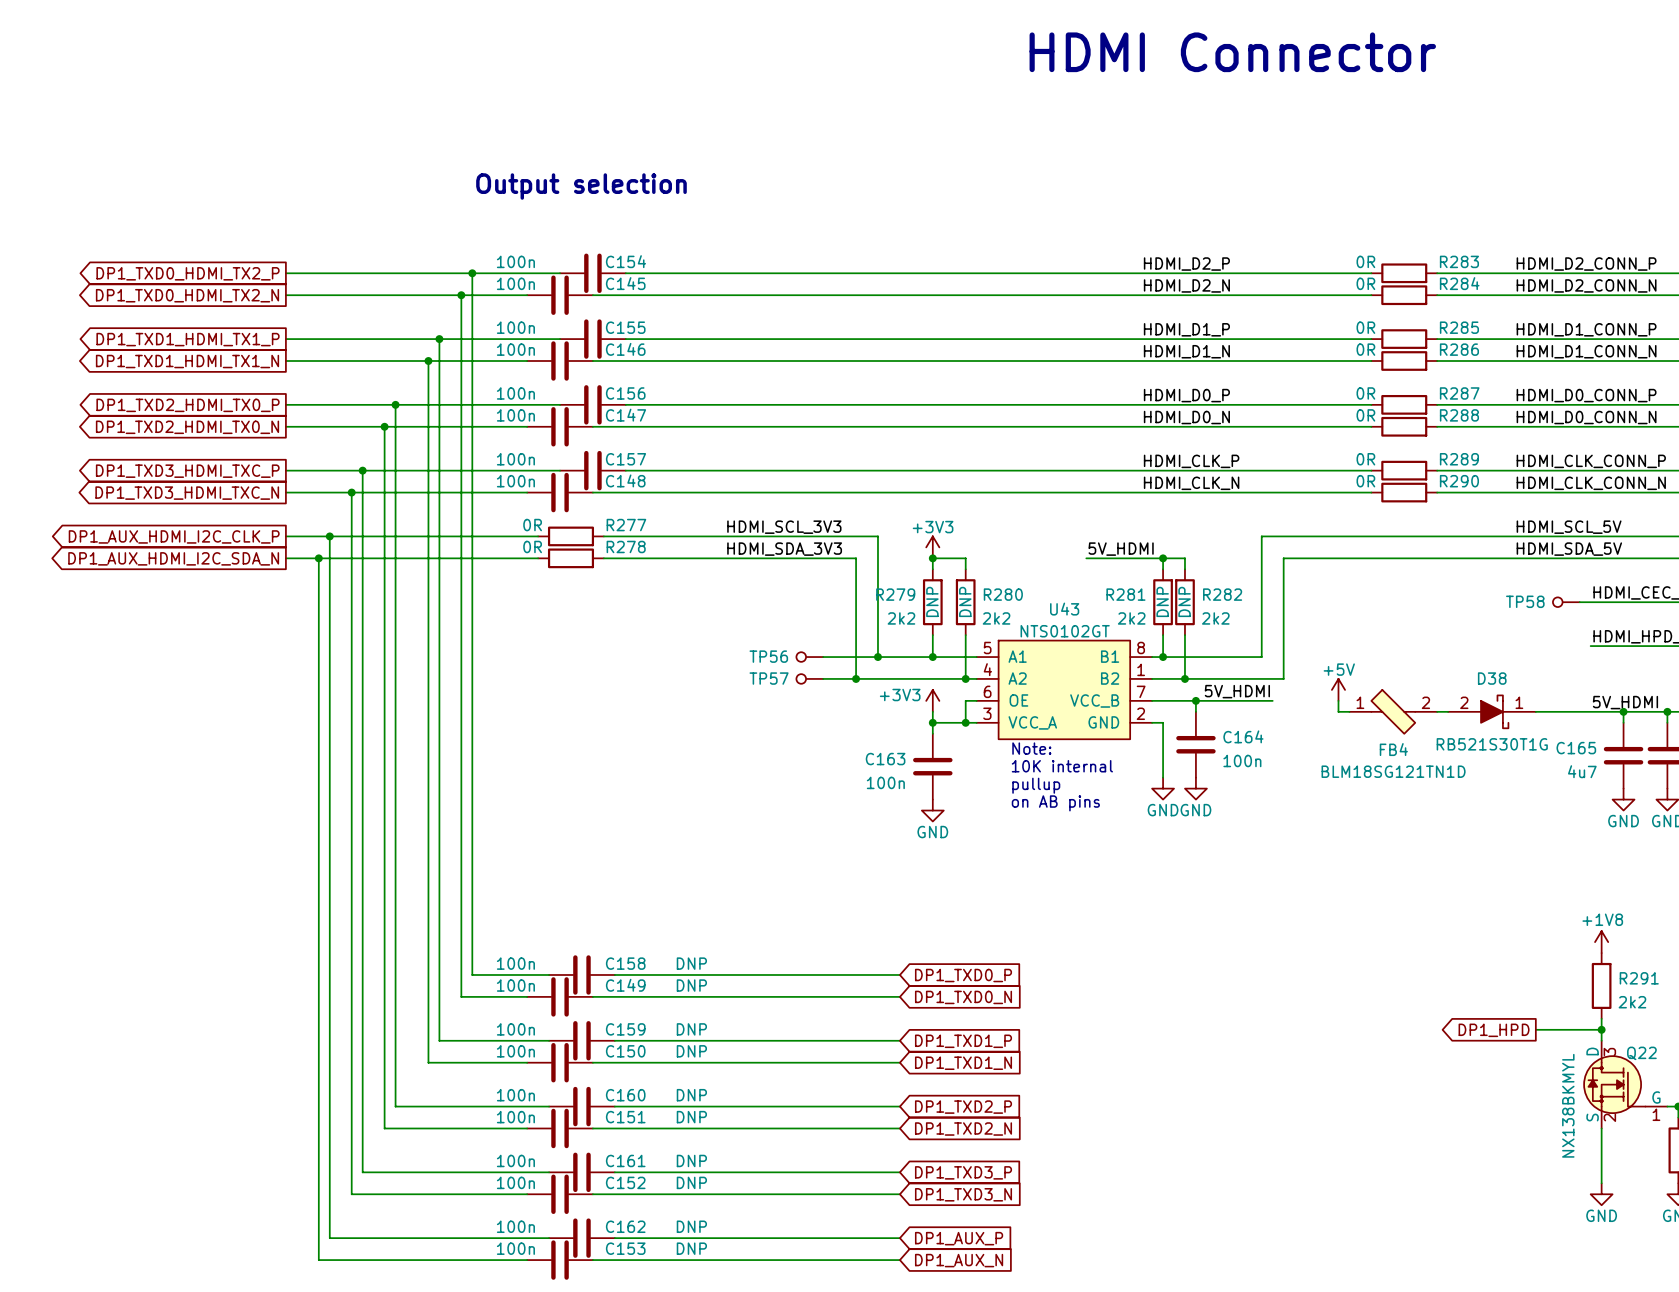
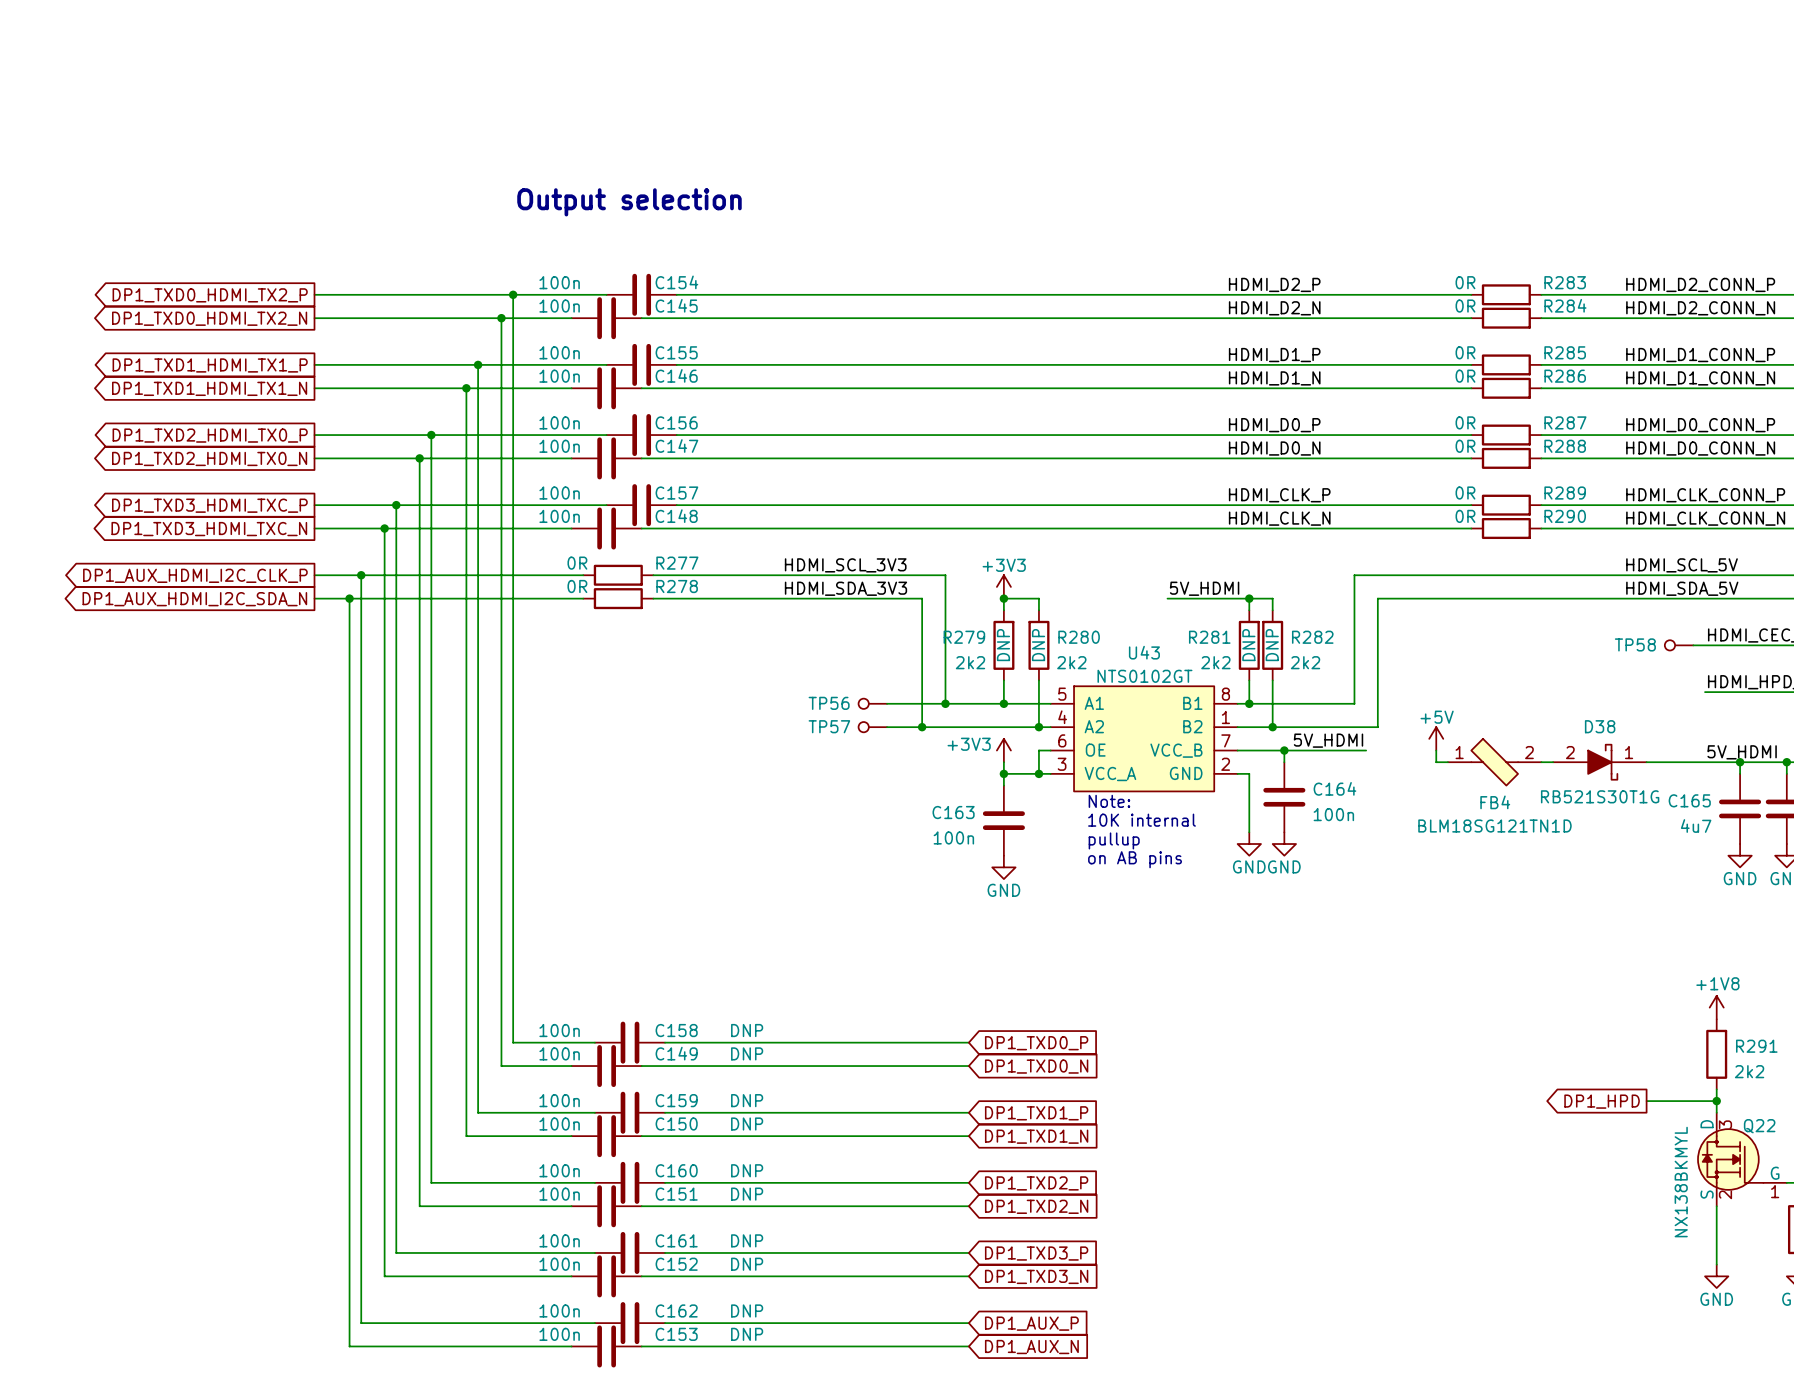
text: HDMI Connector (1232, 52) -> none

